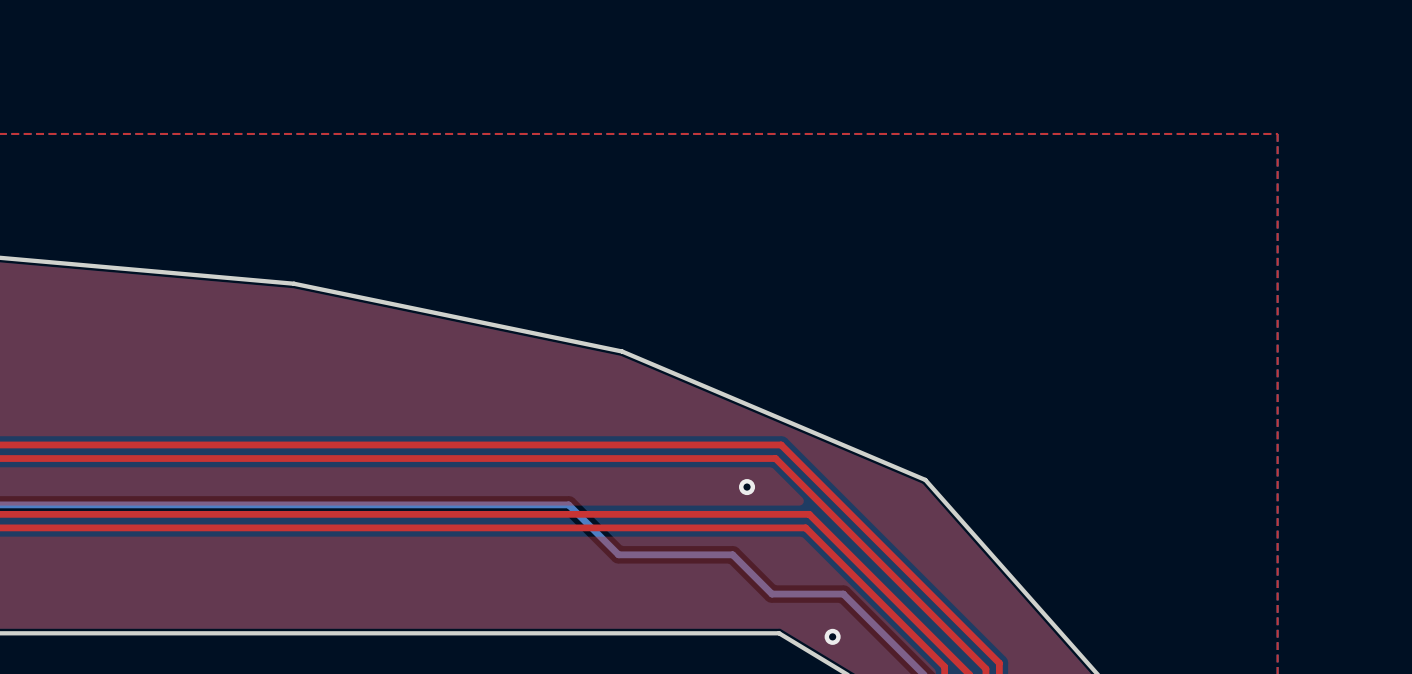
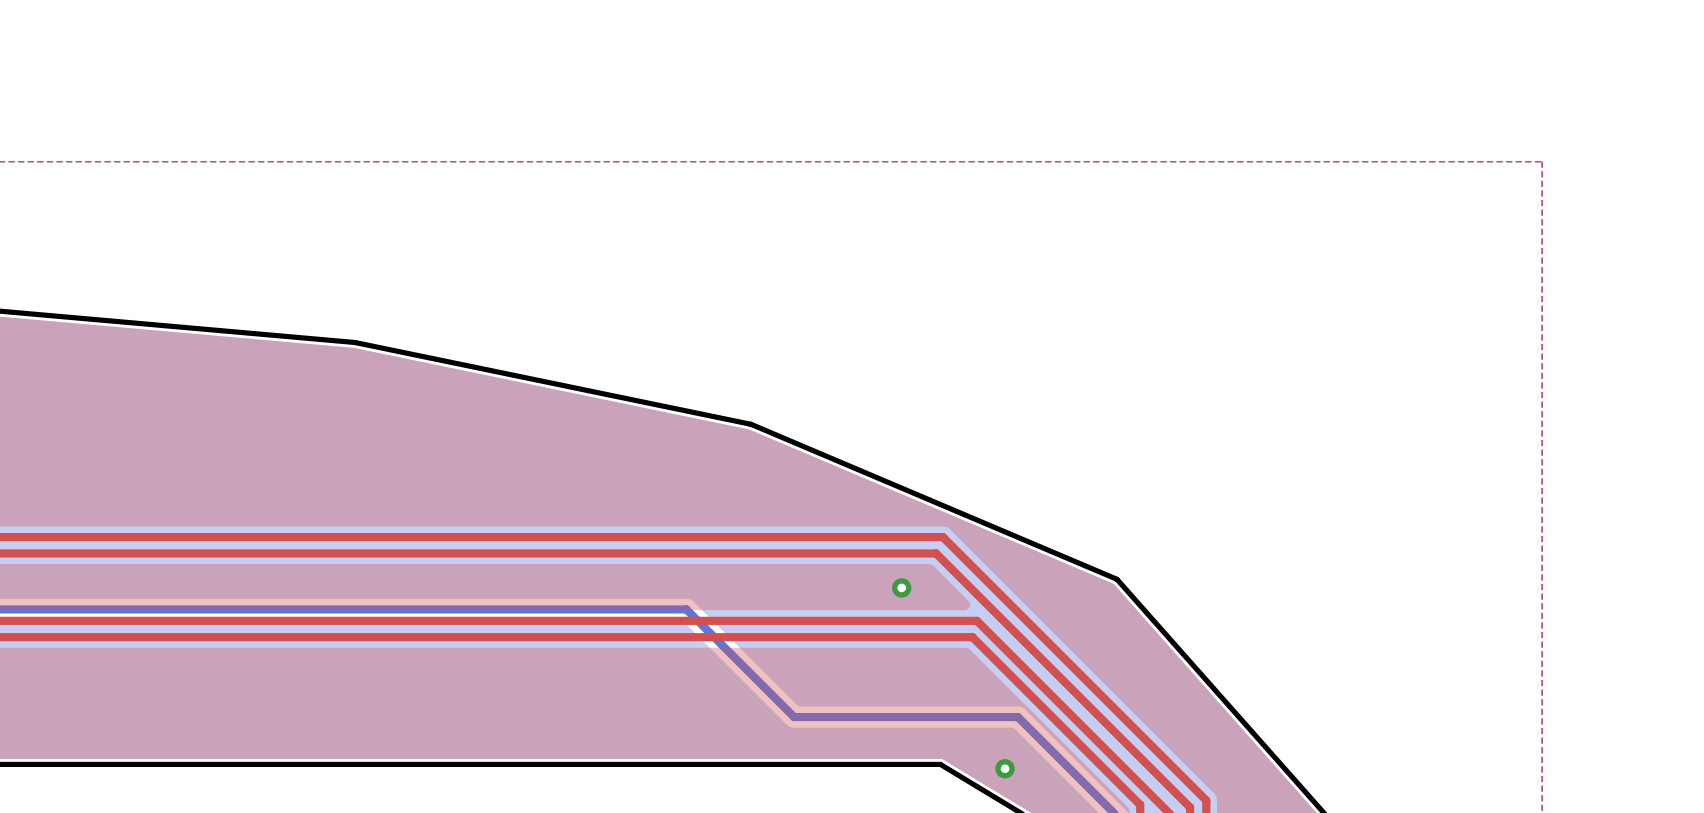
bottom track: (618, 554) (732, 554) (772, 594) -> (746, 669) (794, 717) (931, 717)

